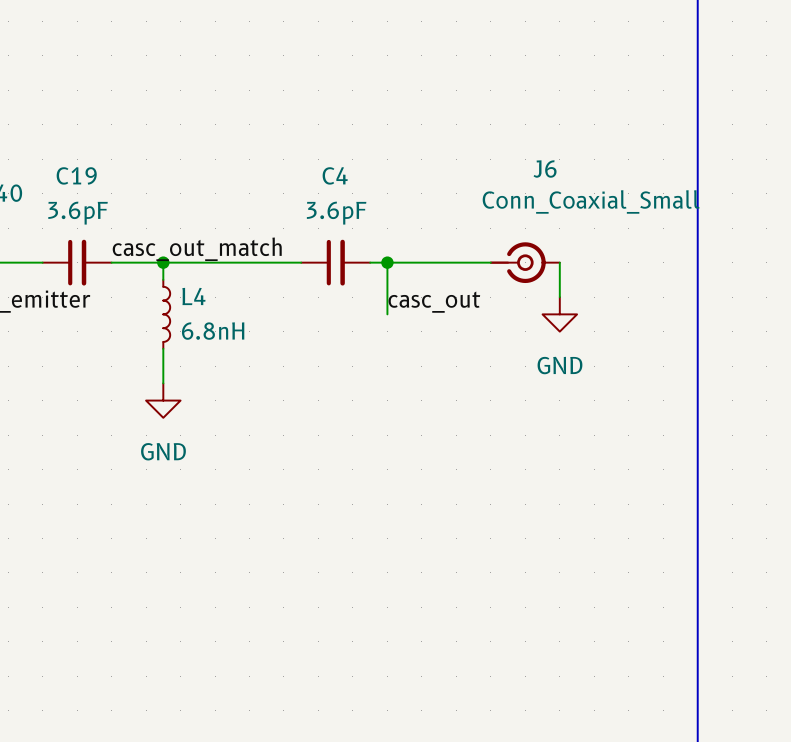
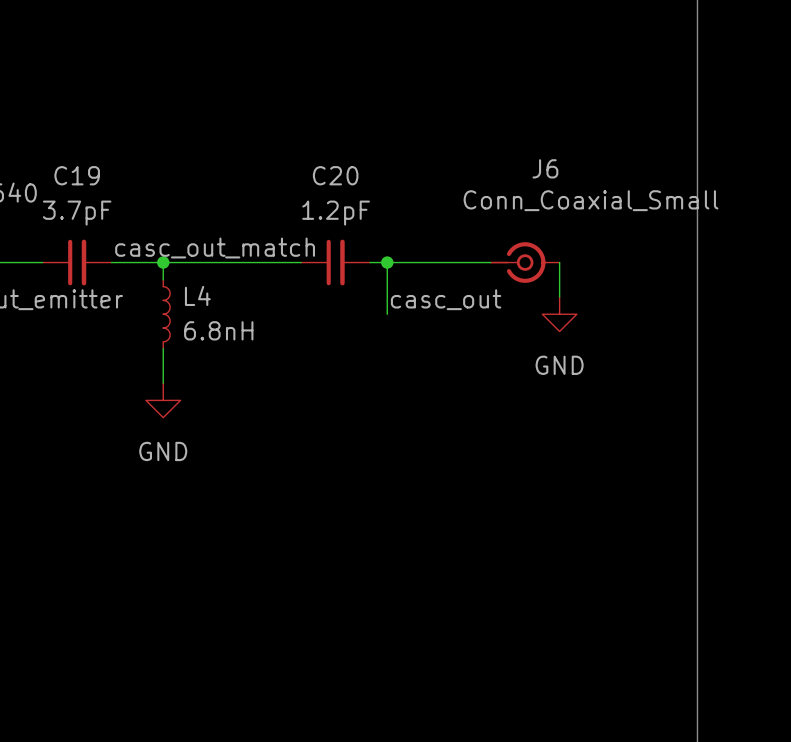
C4 name: C4 (335, 175) -> C20 (335, 175)
C19 value: 3.6pF (78, 213) -> 3.7pF (77, 213)
C4 value: 3.6pF (336, 213) -> 1.2pF (336, 213)

